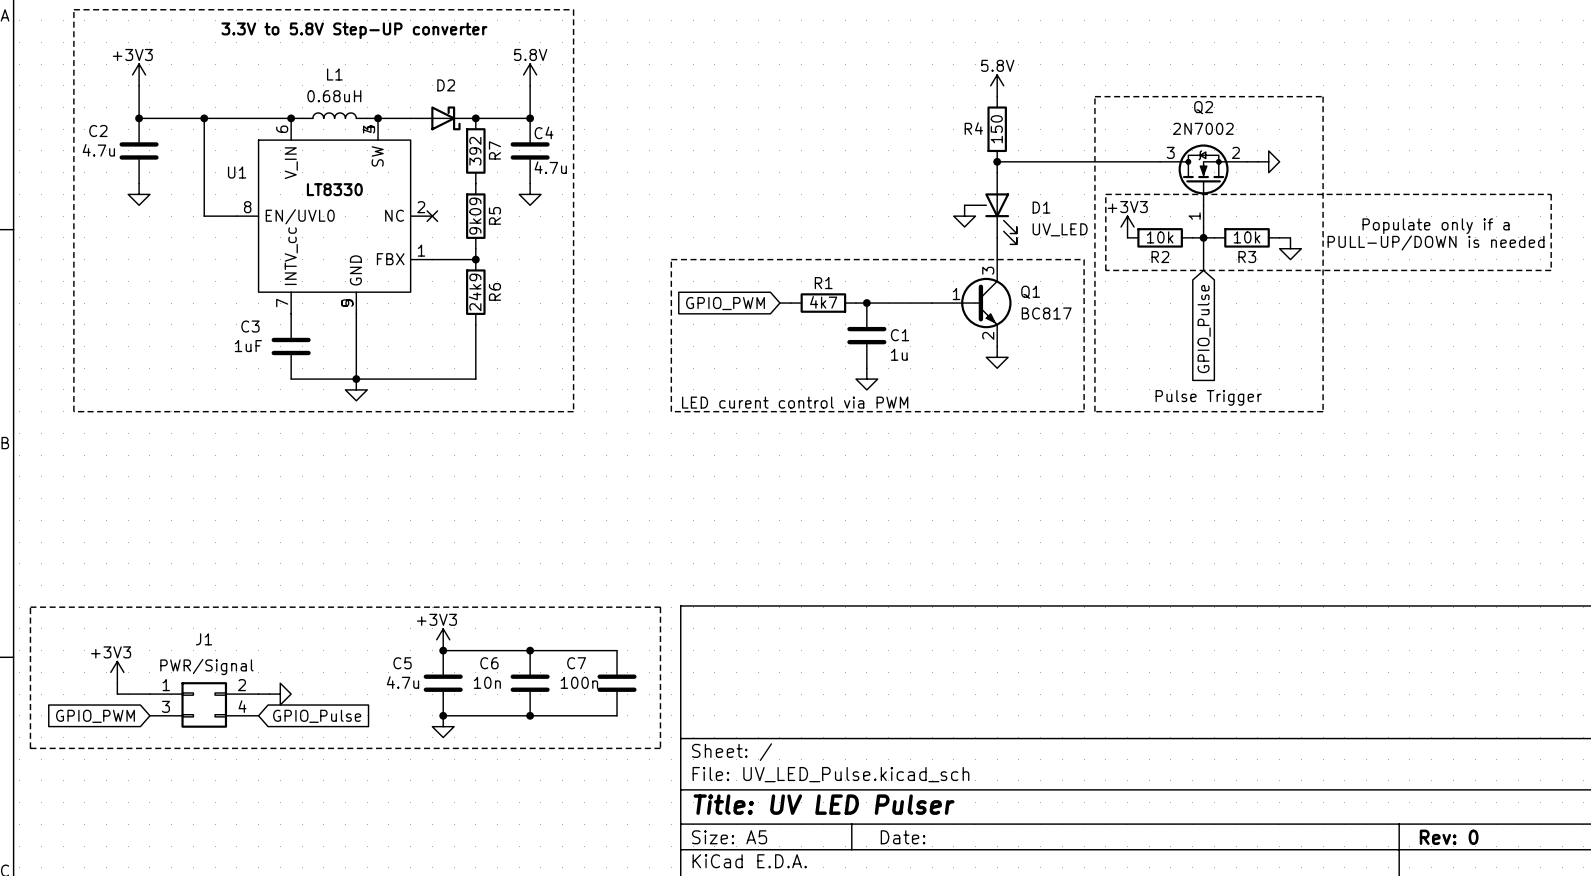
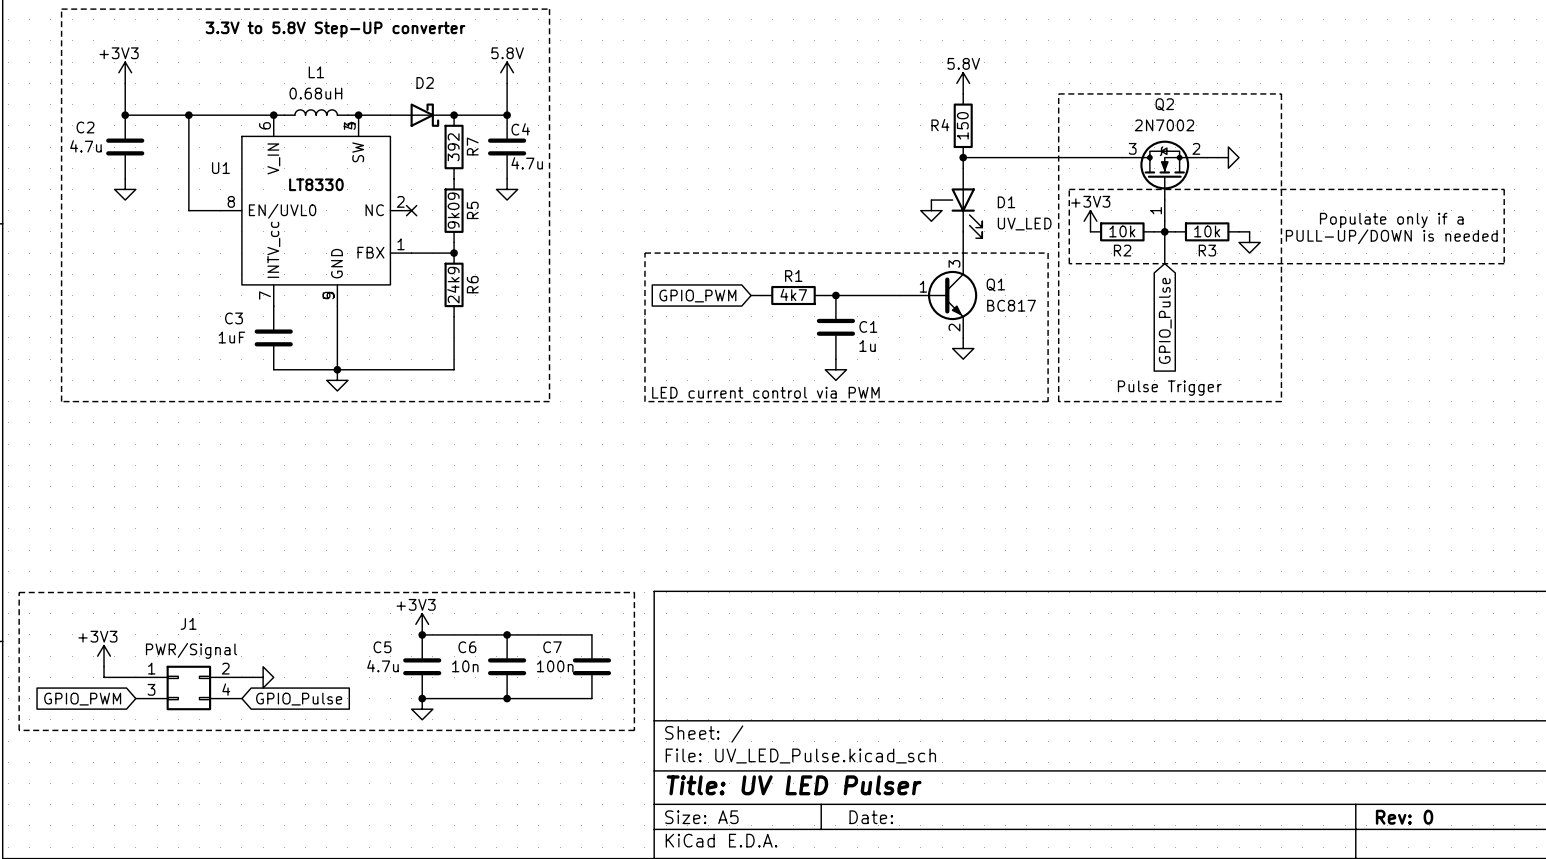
text: LED curent control via PWM (795, 402) -> LED current control via PWM (765, 392)

